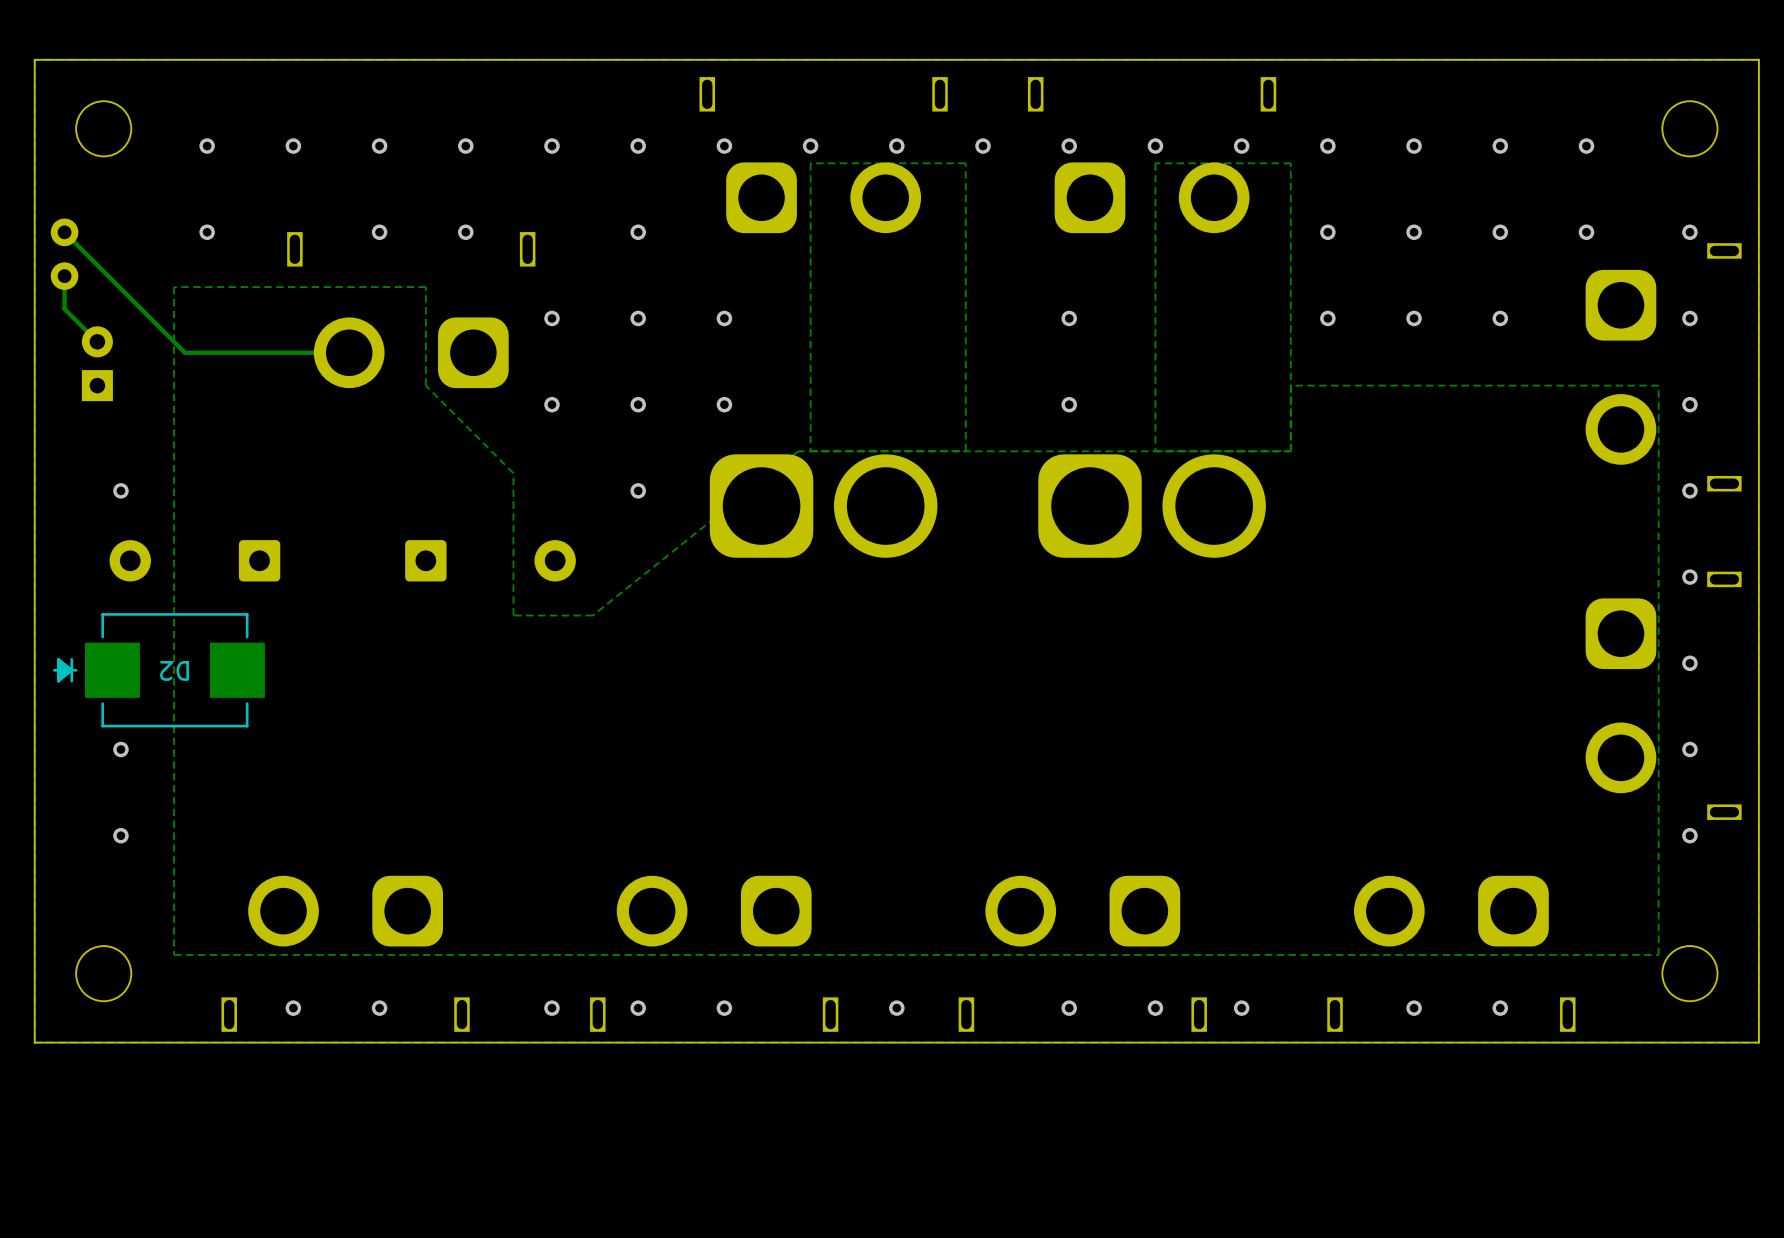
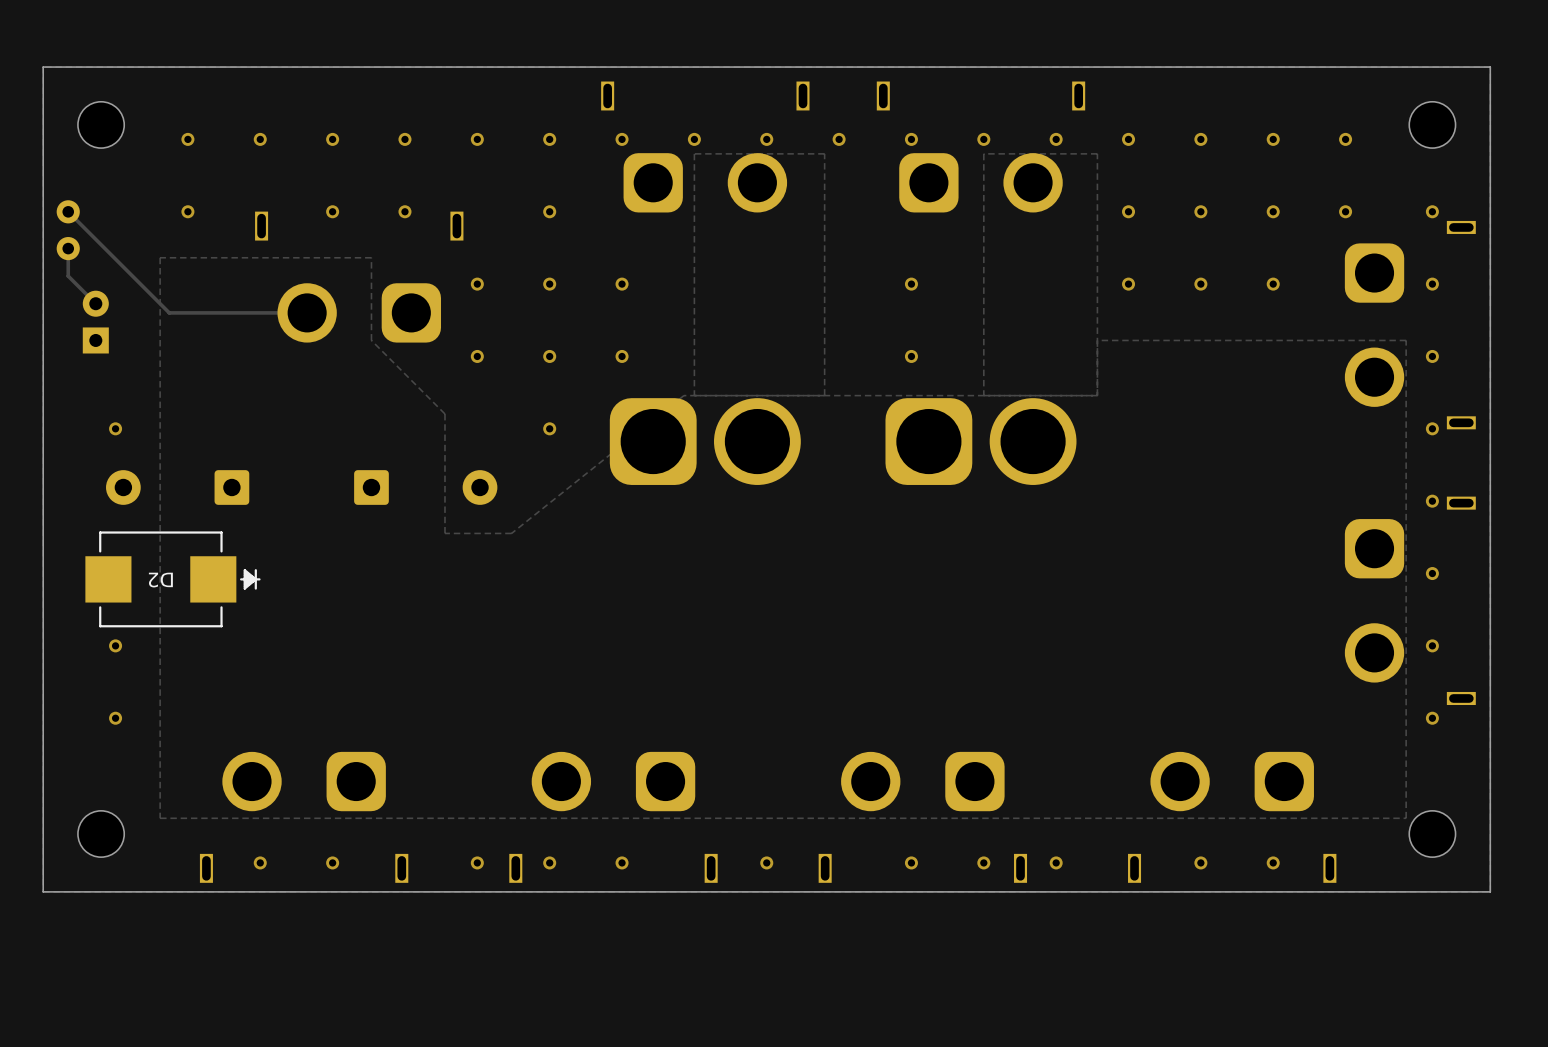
D2 footprint: [52, 613, 265, 728] -> [85, 531, 261, 628]

